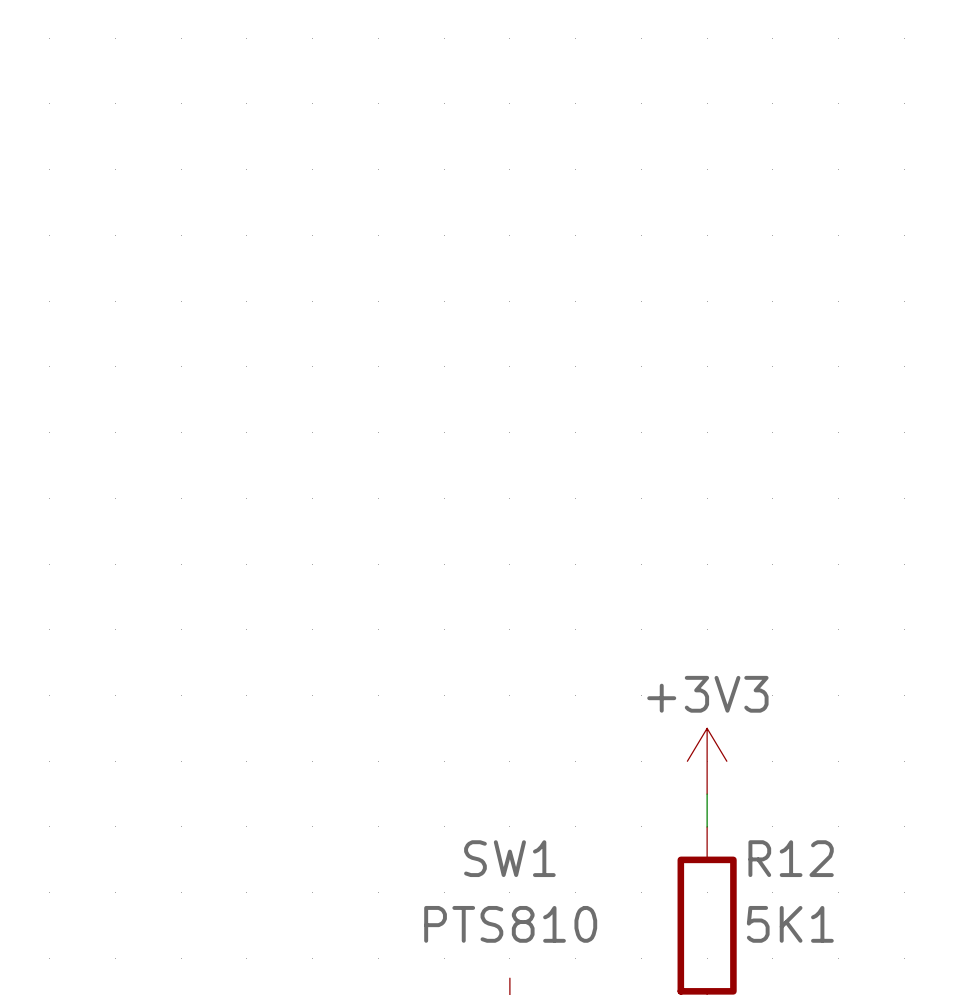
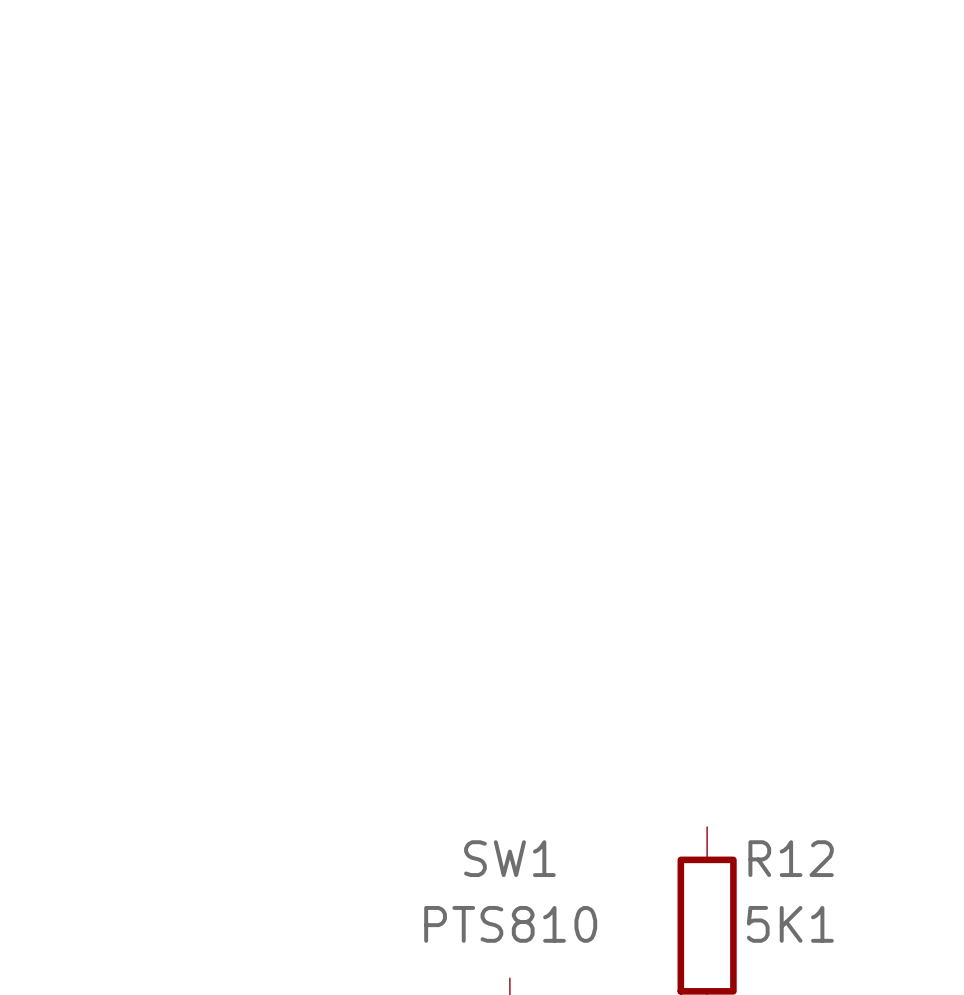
power symbol: +3V3 (707, 761) -> none
wire: (707, 794) (707, 826) -> none

